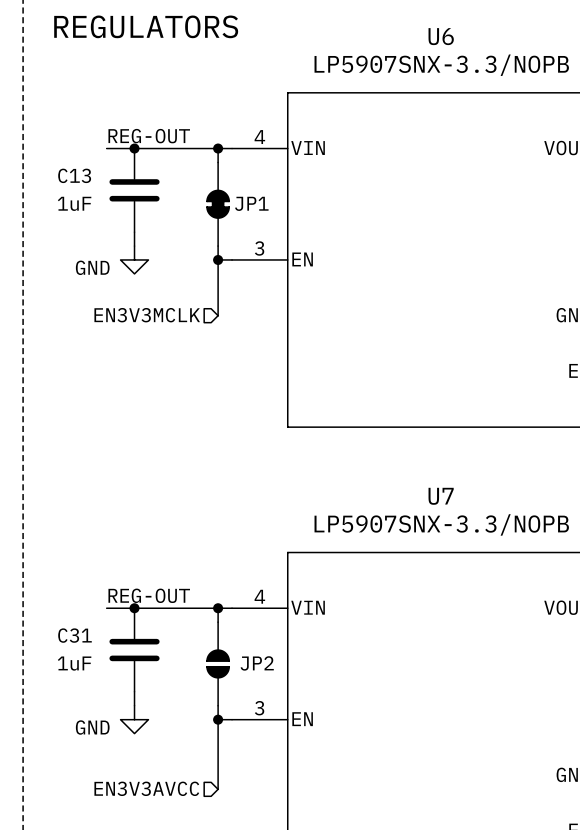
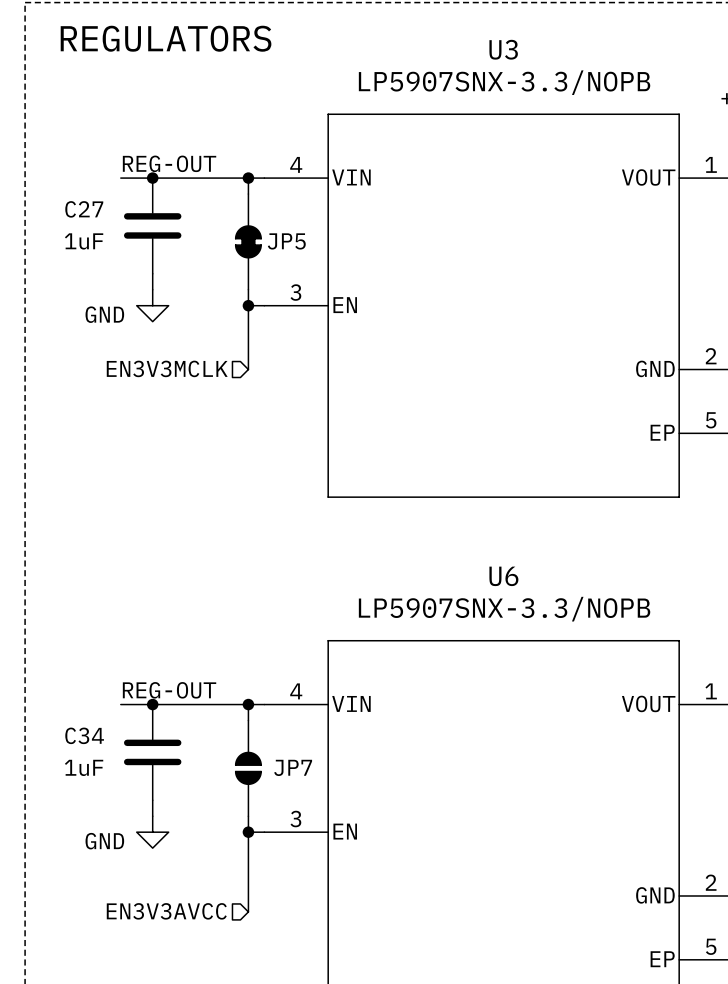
U6 name: U6 (441, 36) -> U3 (503, 49)
C13 name: C13 (74, 175) -> C27 (84, 209)
JP1 name: JP1 (251, 203) -> JP5 (286, 241)
U7 name: U7 (441, 496) -> U6 (503, 576)
C31 name: C31 (74, 635) -> C34 (84, 735)
JP2 name: JP2 (257, 663) -> JP7 (293, 767)

